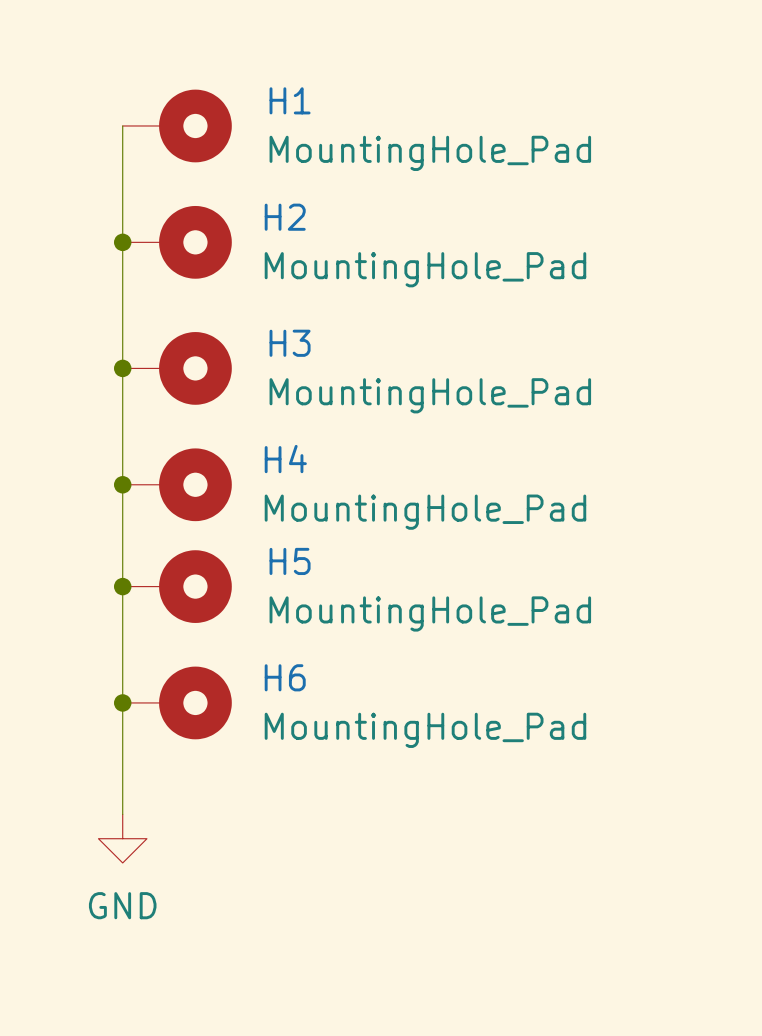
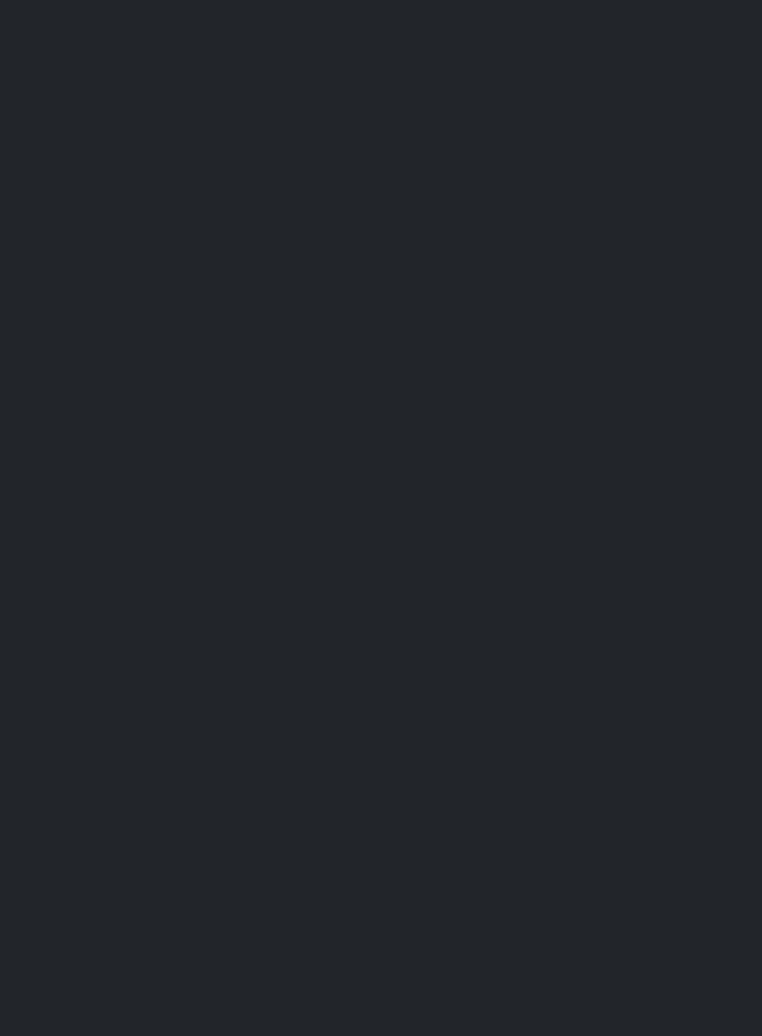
wire: (122, 125) (122, 814) -> none
H1: MountingHole_Pad (177, 125) -> none
junction: (122, 242) -> none
H2: MountingHole_Pad (177, 242) -> none
junction: (122, 368) -> none
H3: MountingHole_Pad (177, 368) -> none
junction: (122, 484) -> none
H4: MountingHole_Pad (177, 484) -> none
junction: (122, 586) -> none
H5: MountingHole_Pad (177, 586) -> none
junction: (122, 702) -> none
H6: MountingHole_Pad (177, 702) -> none
power symbol: GND (122, 838) -> none

